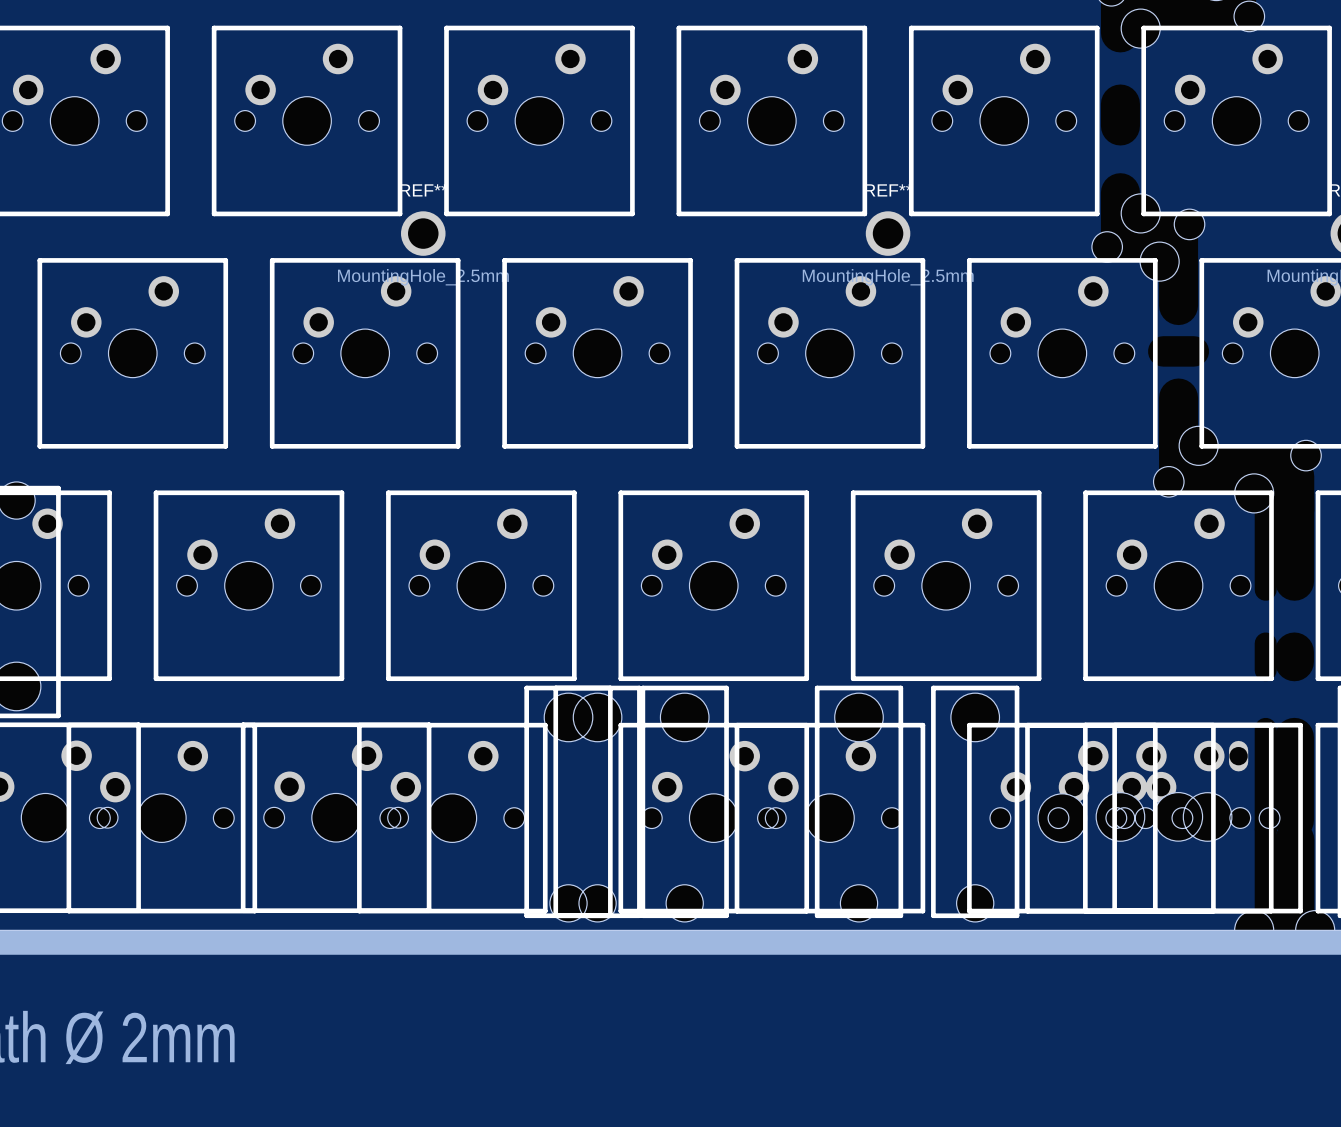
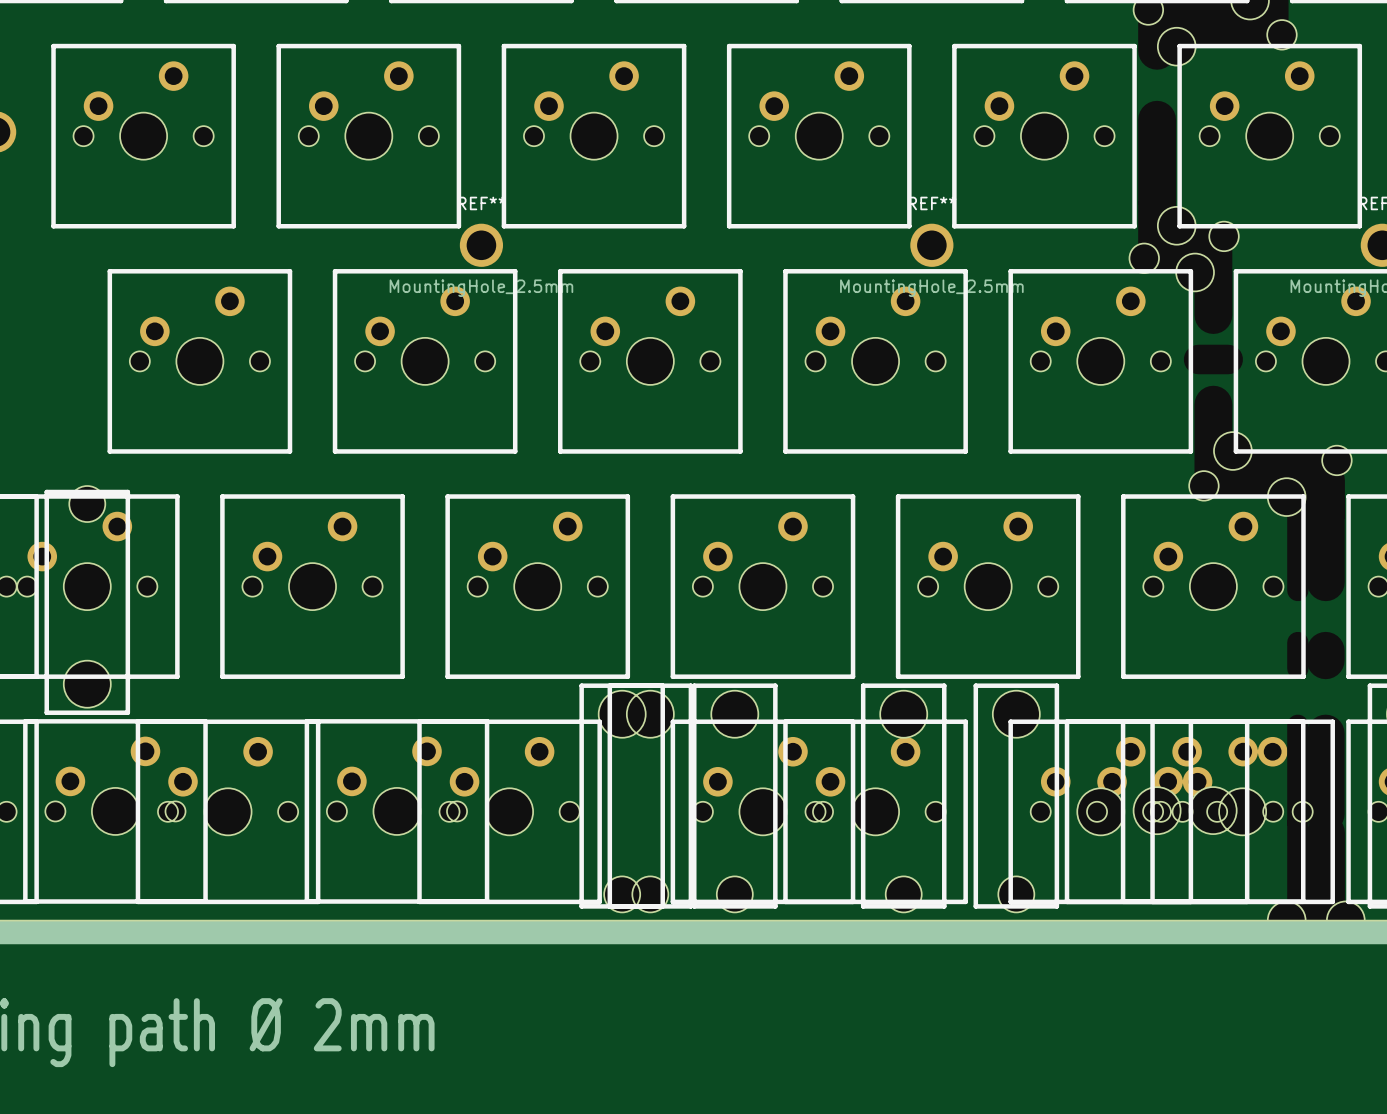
part: (1120, 115) -> none
part: none -> (1157, 159)
part footprint: [1112, 722, 1303, 914] -> [1150, 719, 1335, 905]

